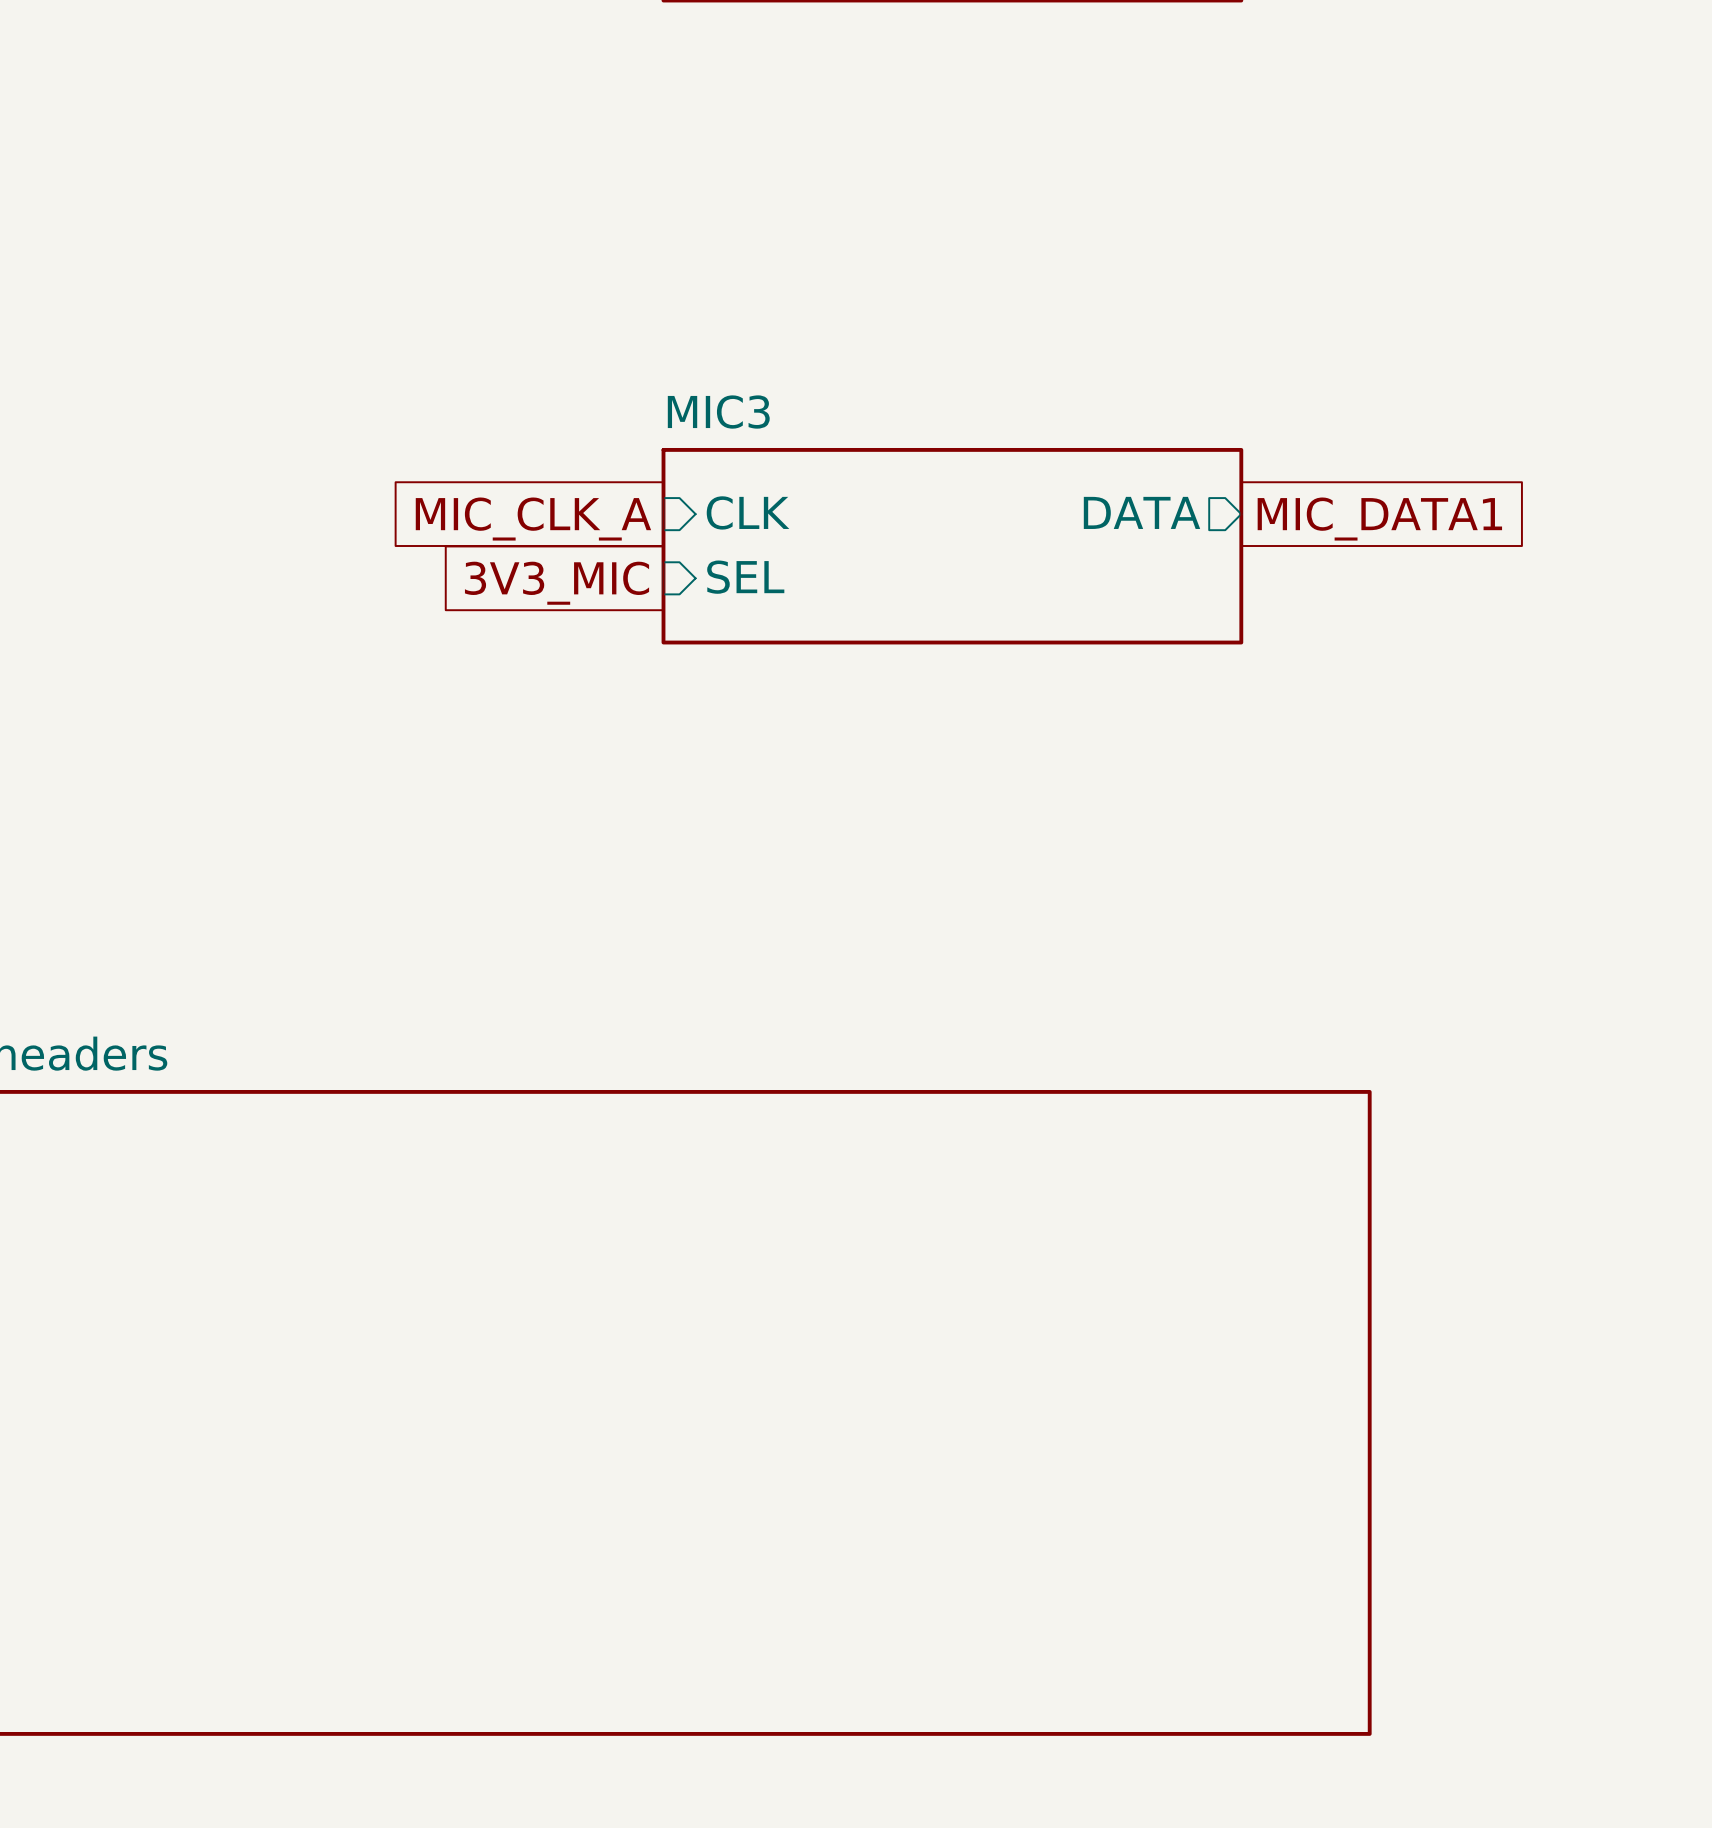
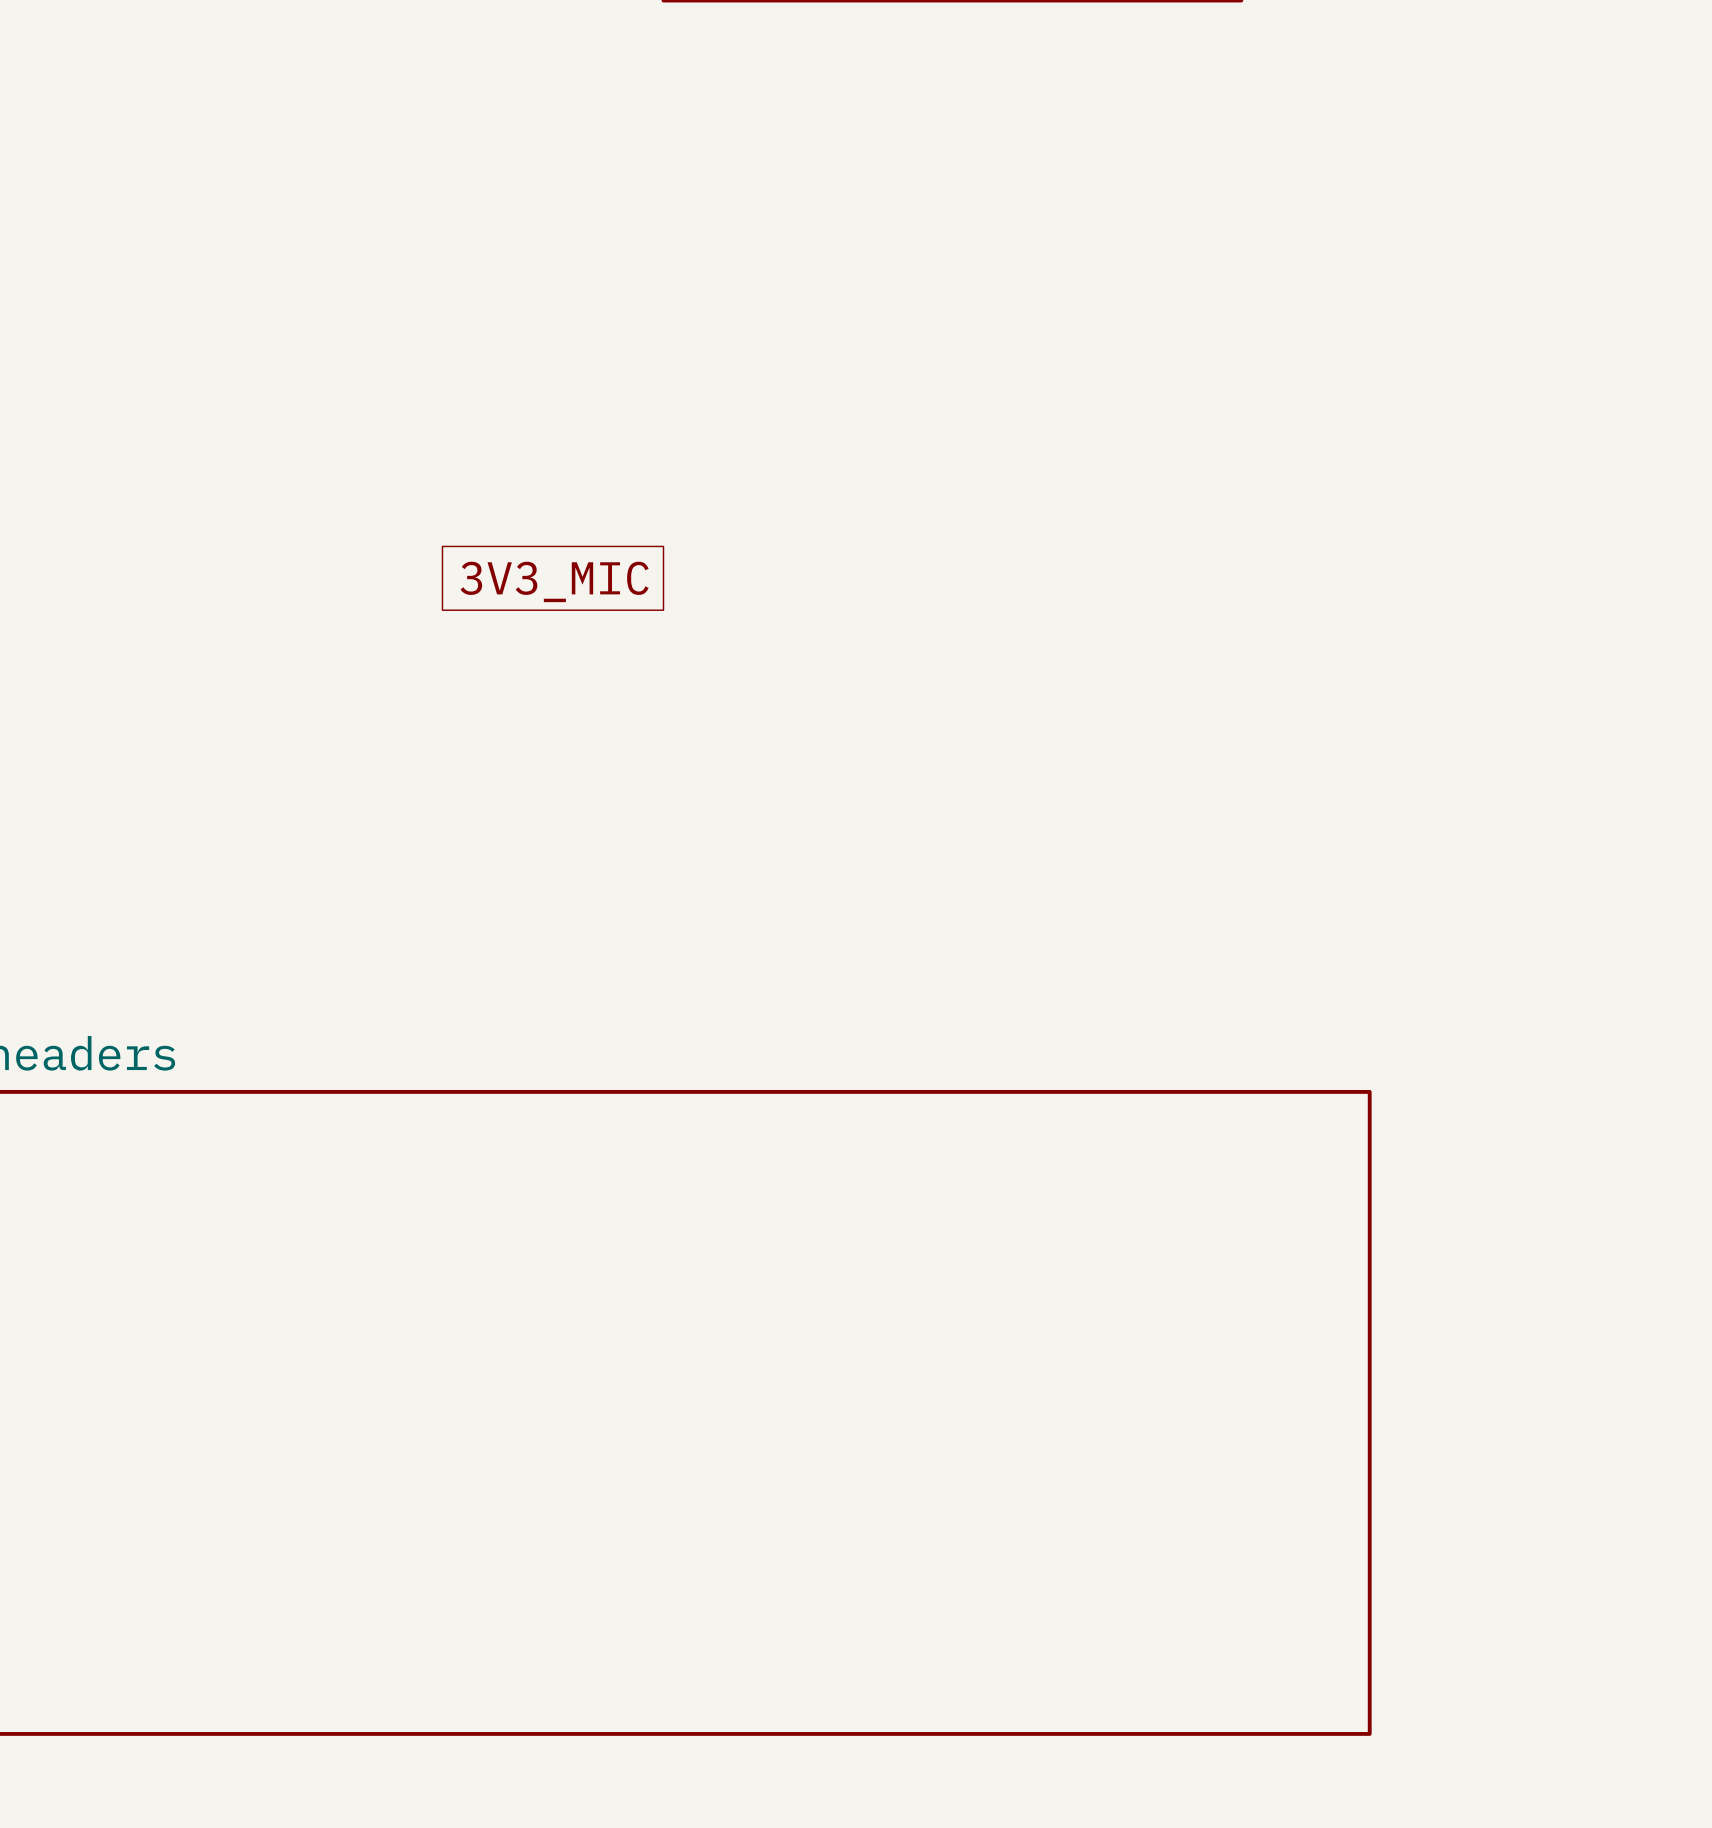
sheet pin: CLK (748, 512) -> none
sheet pin: DATA (1141, 512) -> none
global label: MIC_CLK_A (533, 519) -> none
global label: MIC_DATA1 (1379, 519) -> none
sheet MIC3: (952, 546) -> none
sheet pin: SEL (745, 577) -> none

